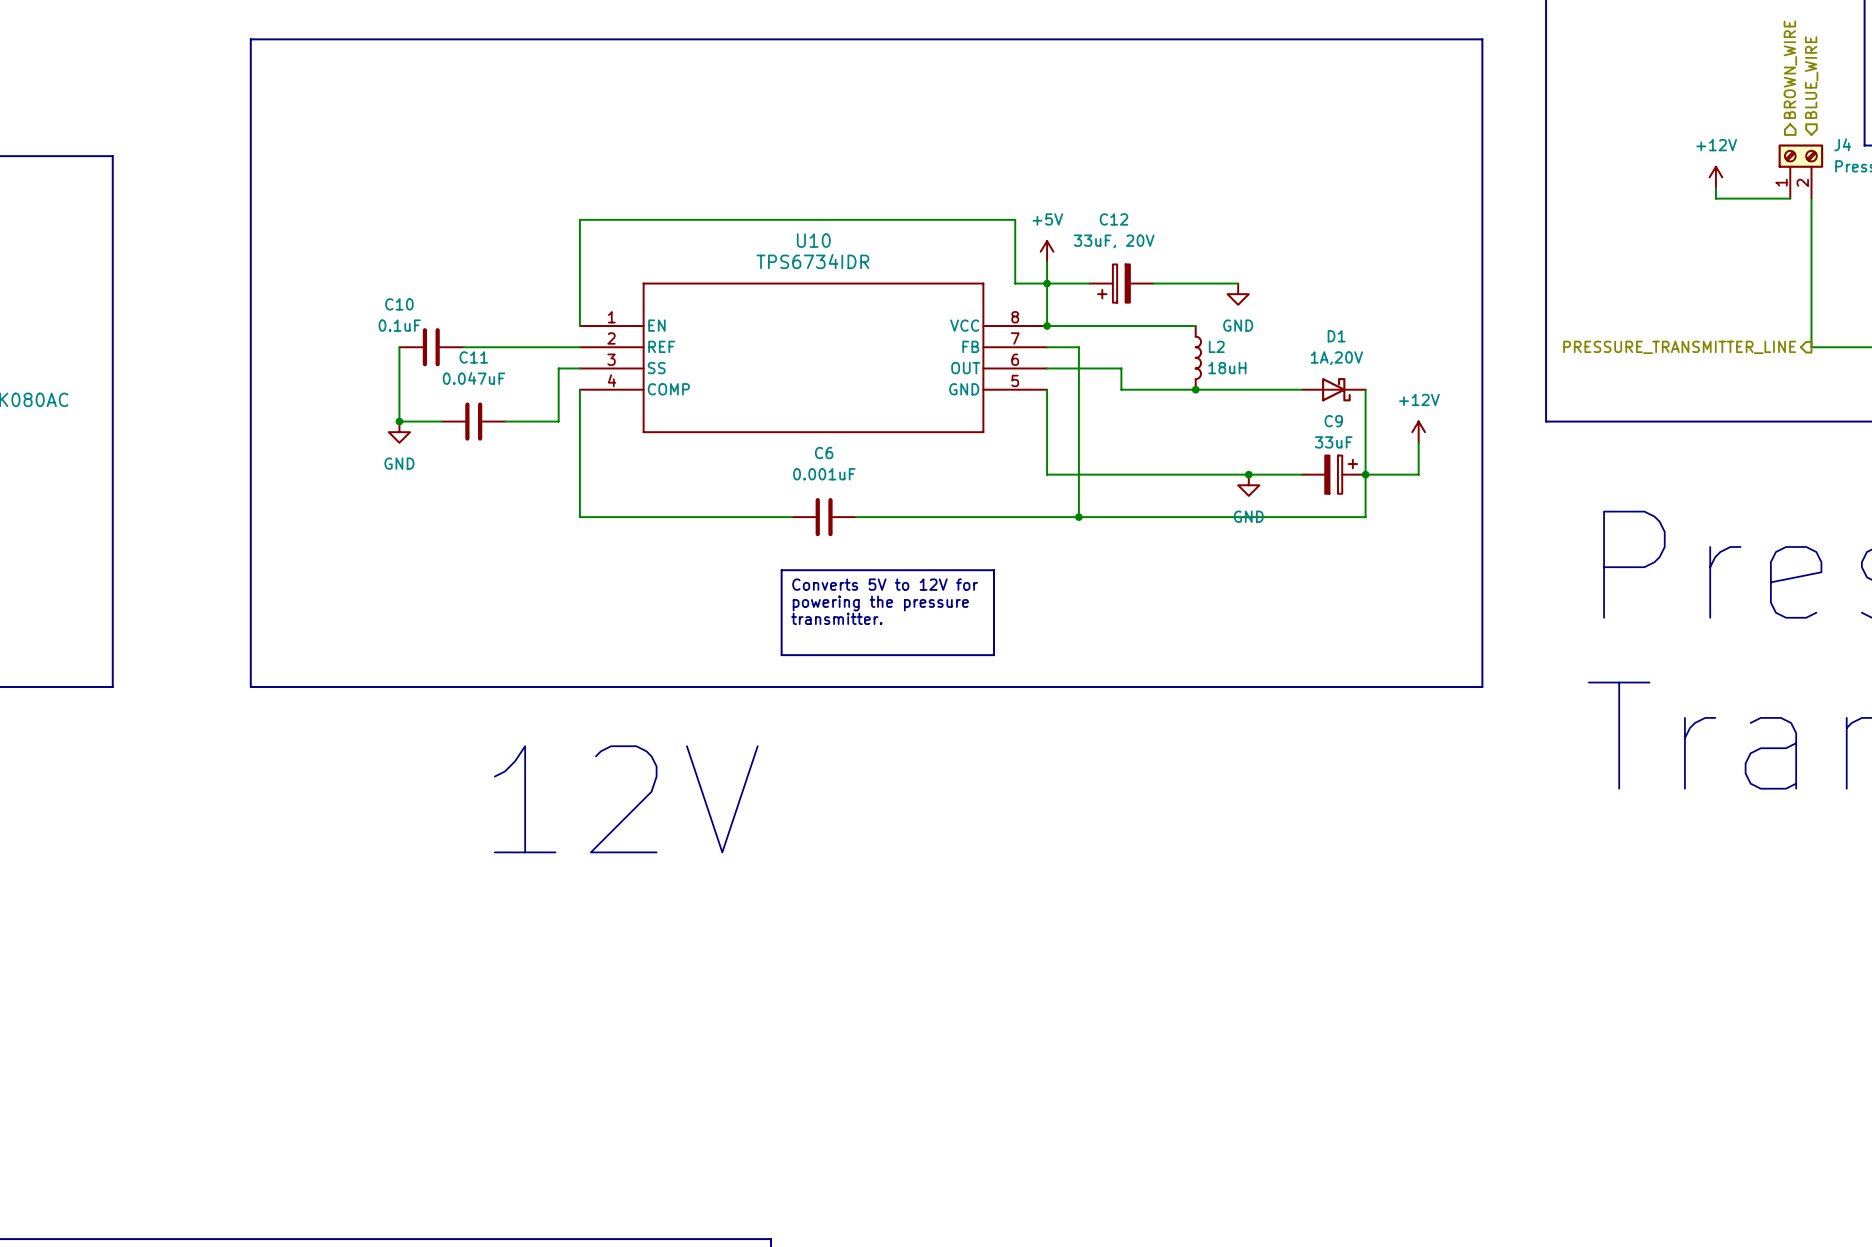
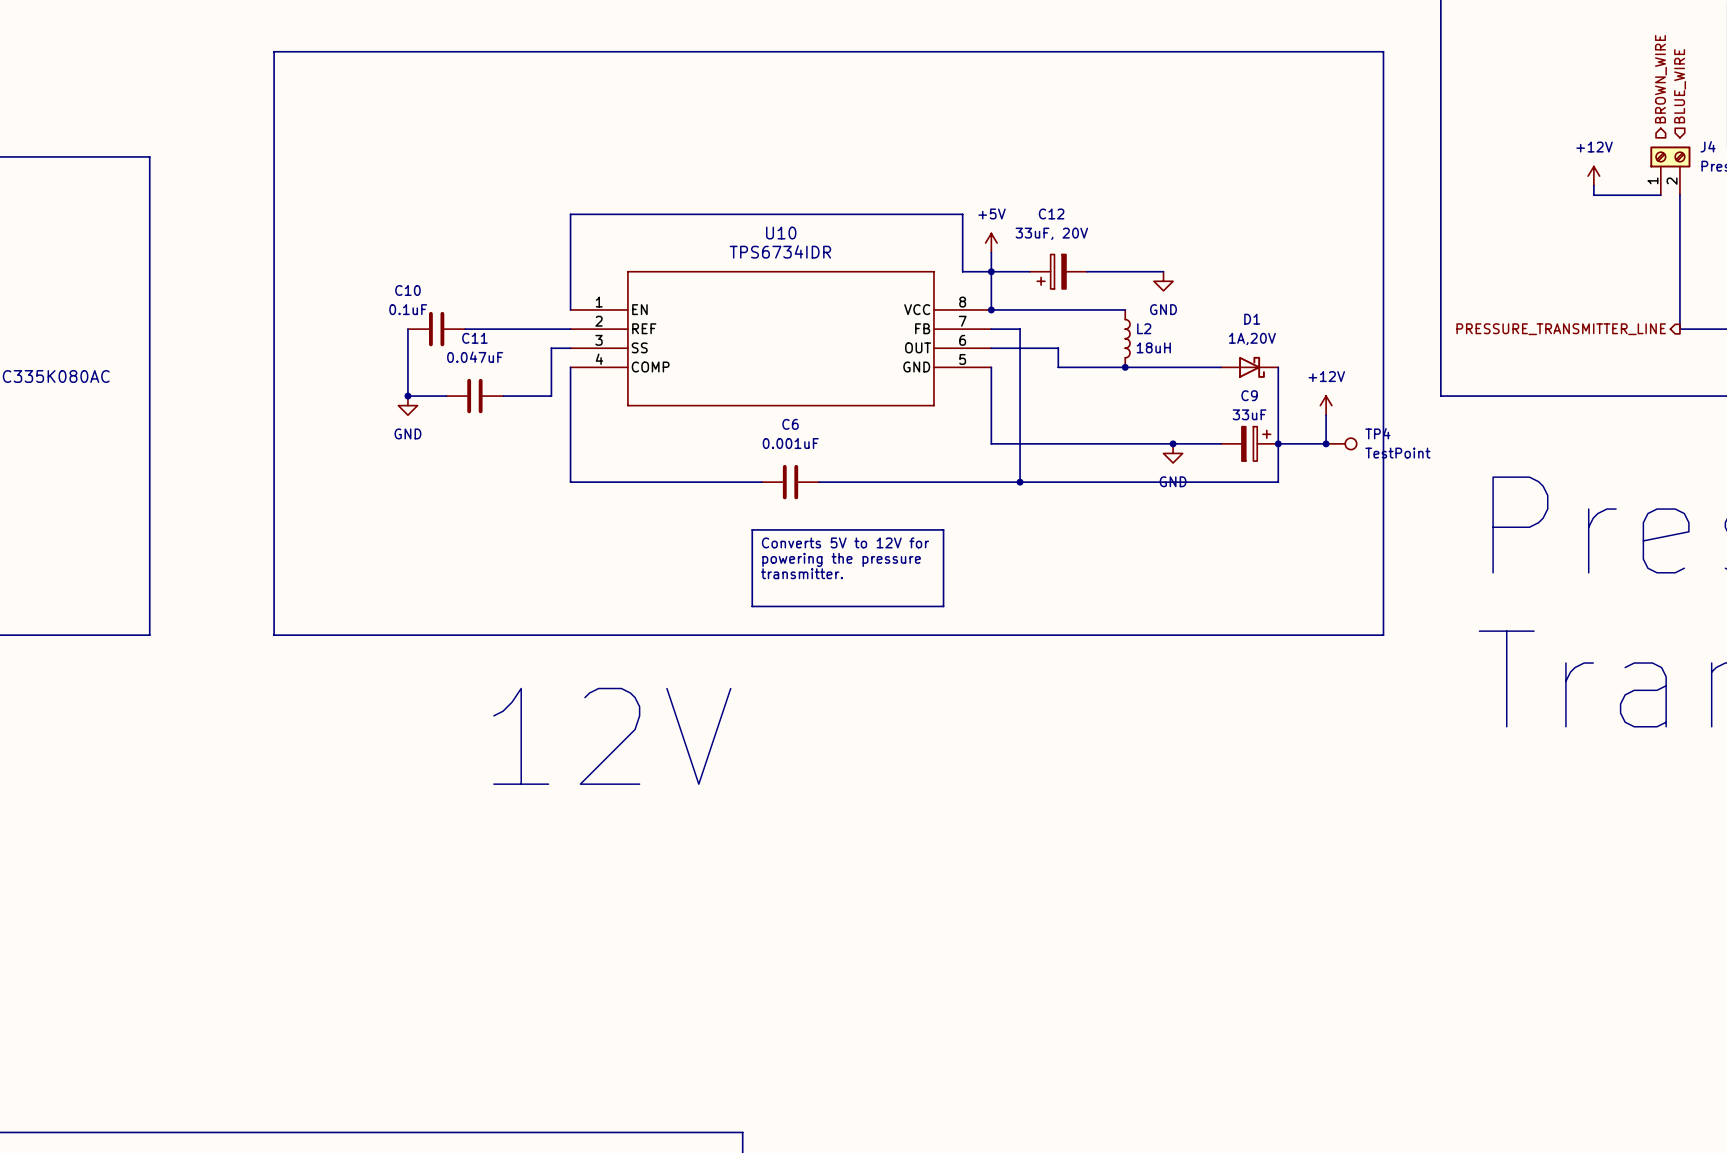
junction: none -> (1326, 443)
TP4: none -> TestPoint (1341, 443)

